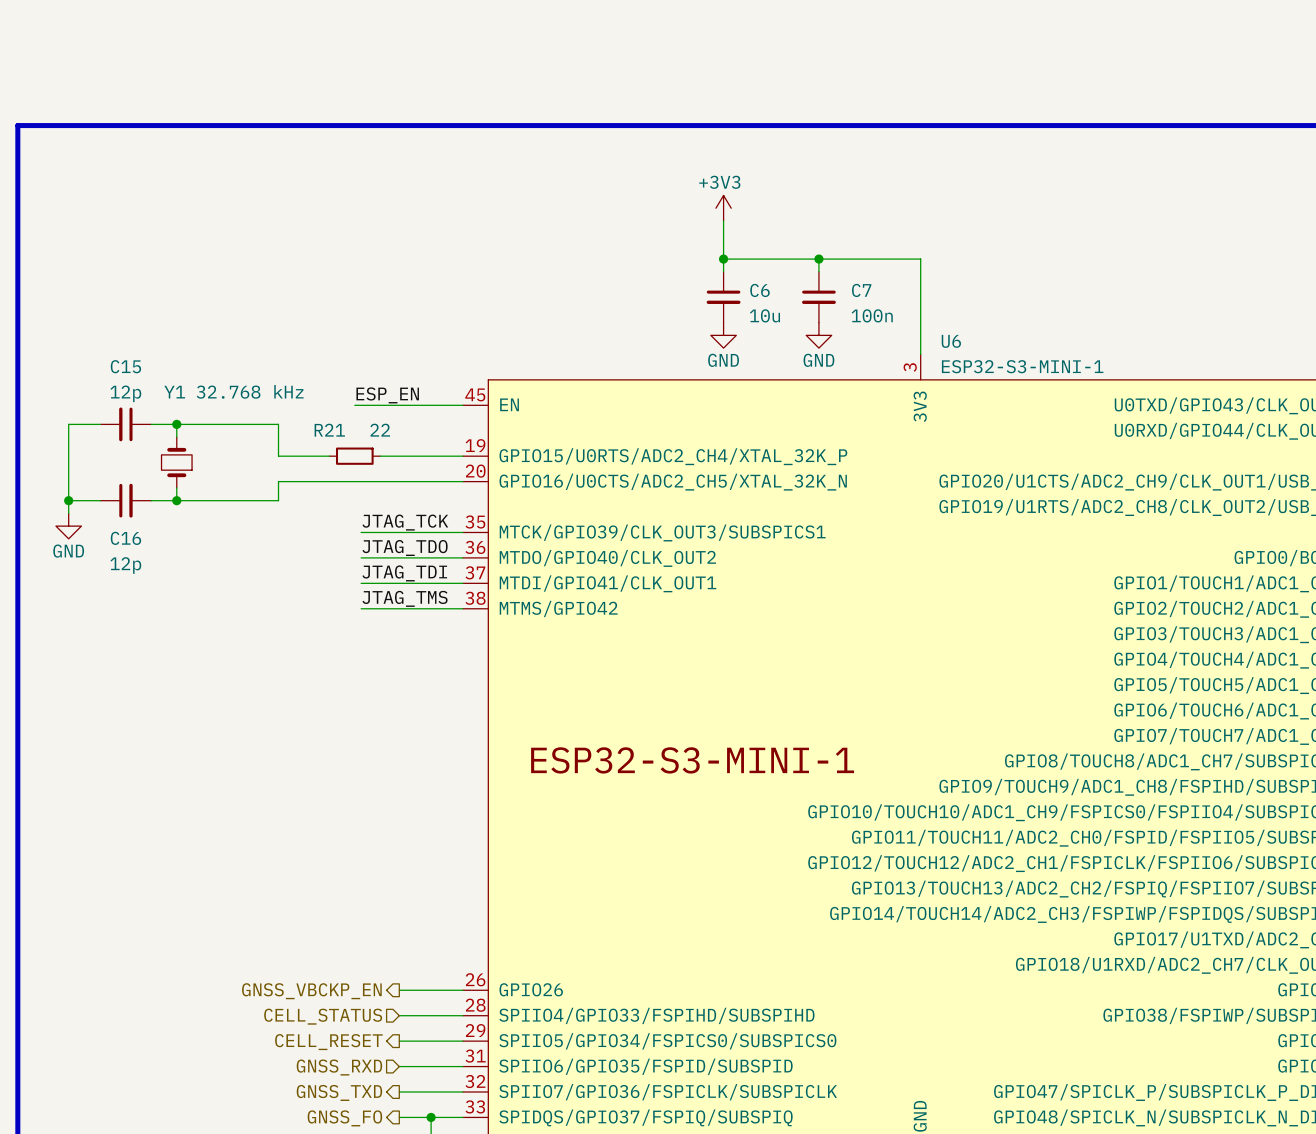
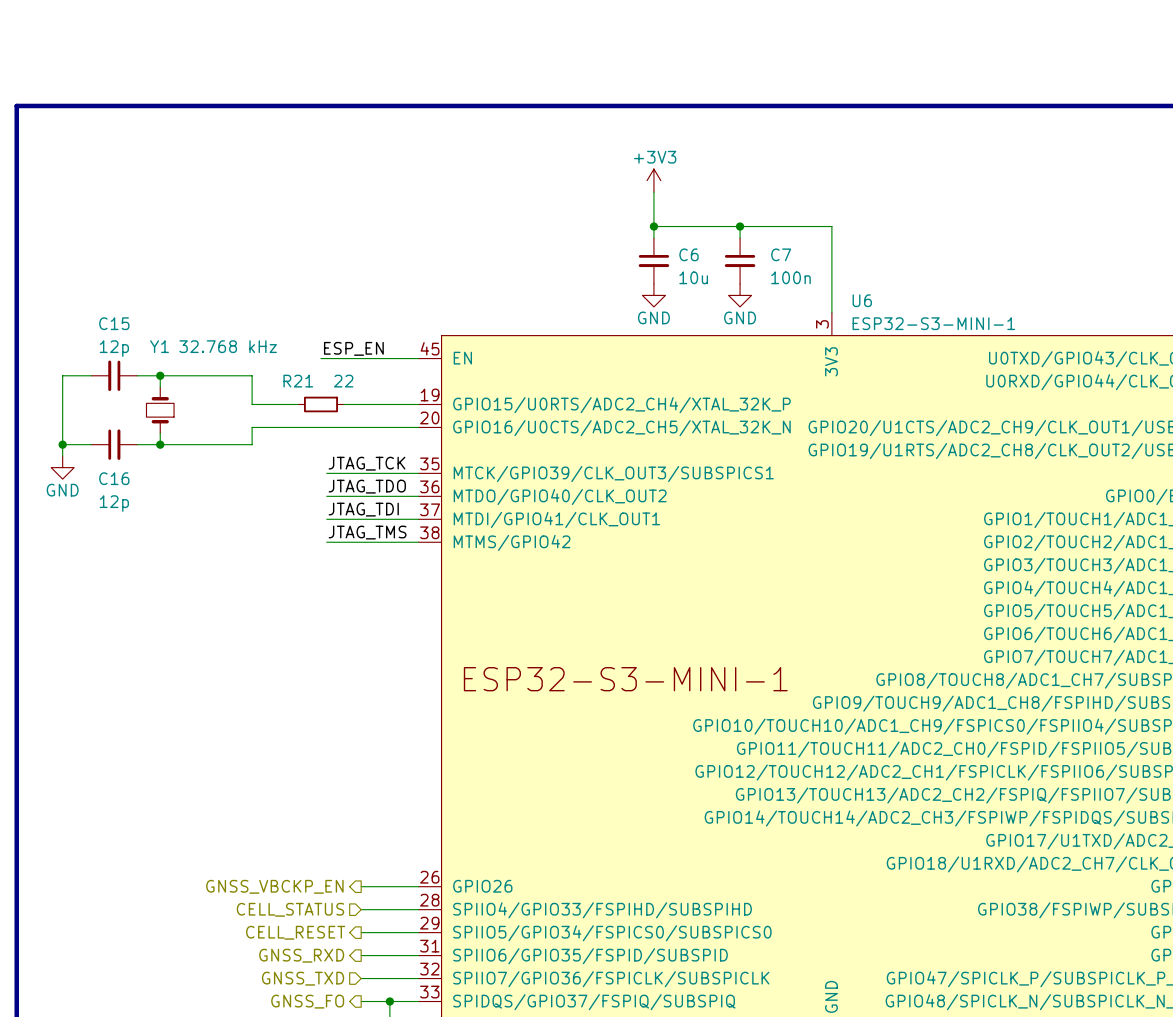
hierarchical label shape: input (339, 1067) -> output (301, 955)
hierarchical label shape: output (339, 1092) -> input (303, 978)

